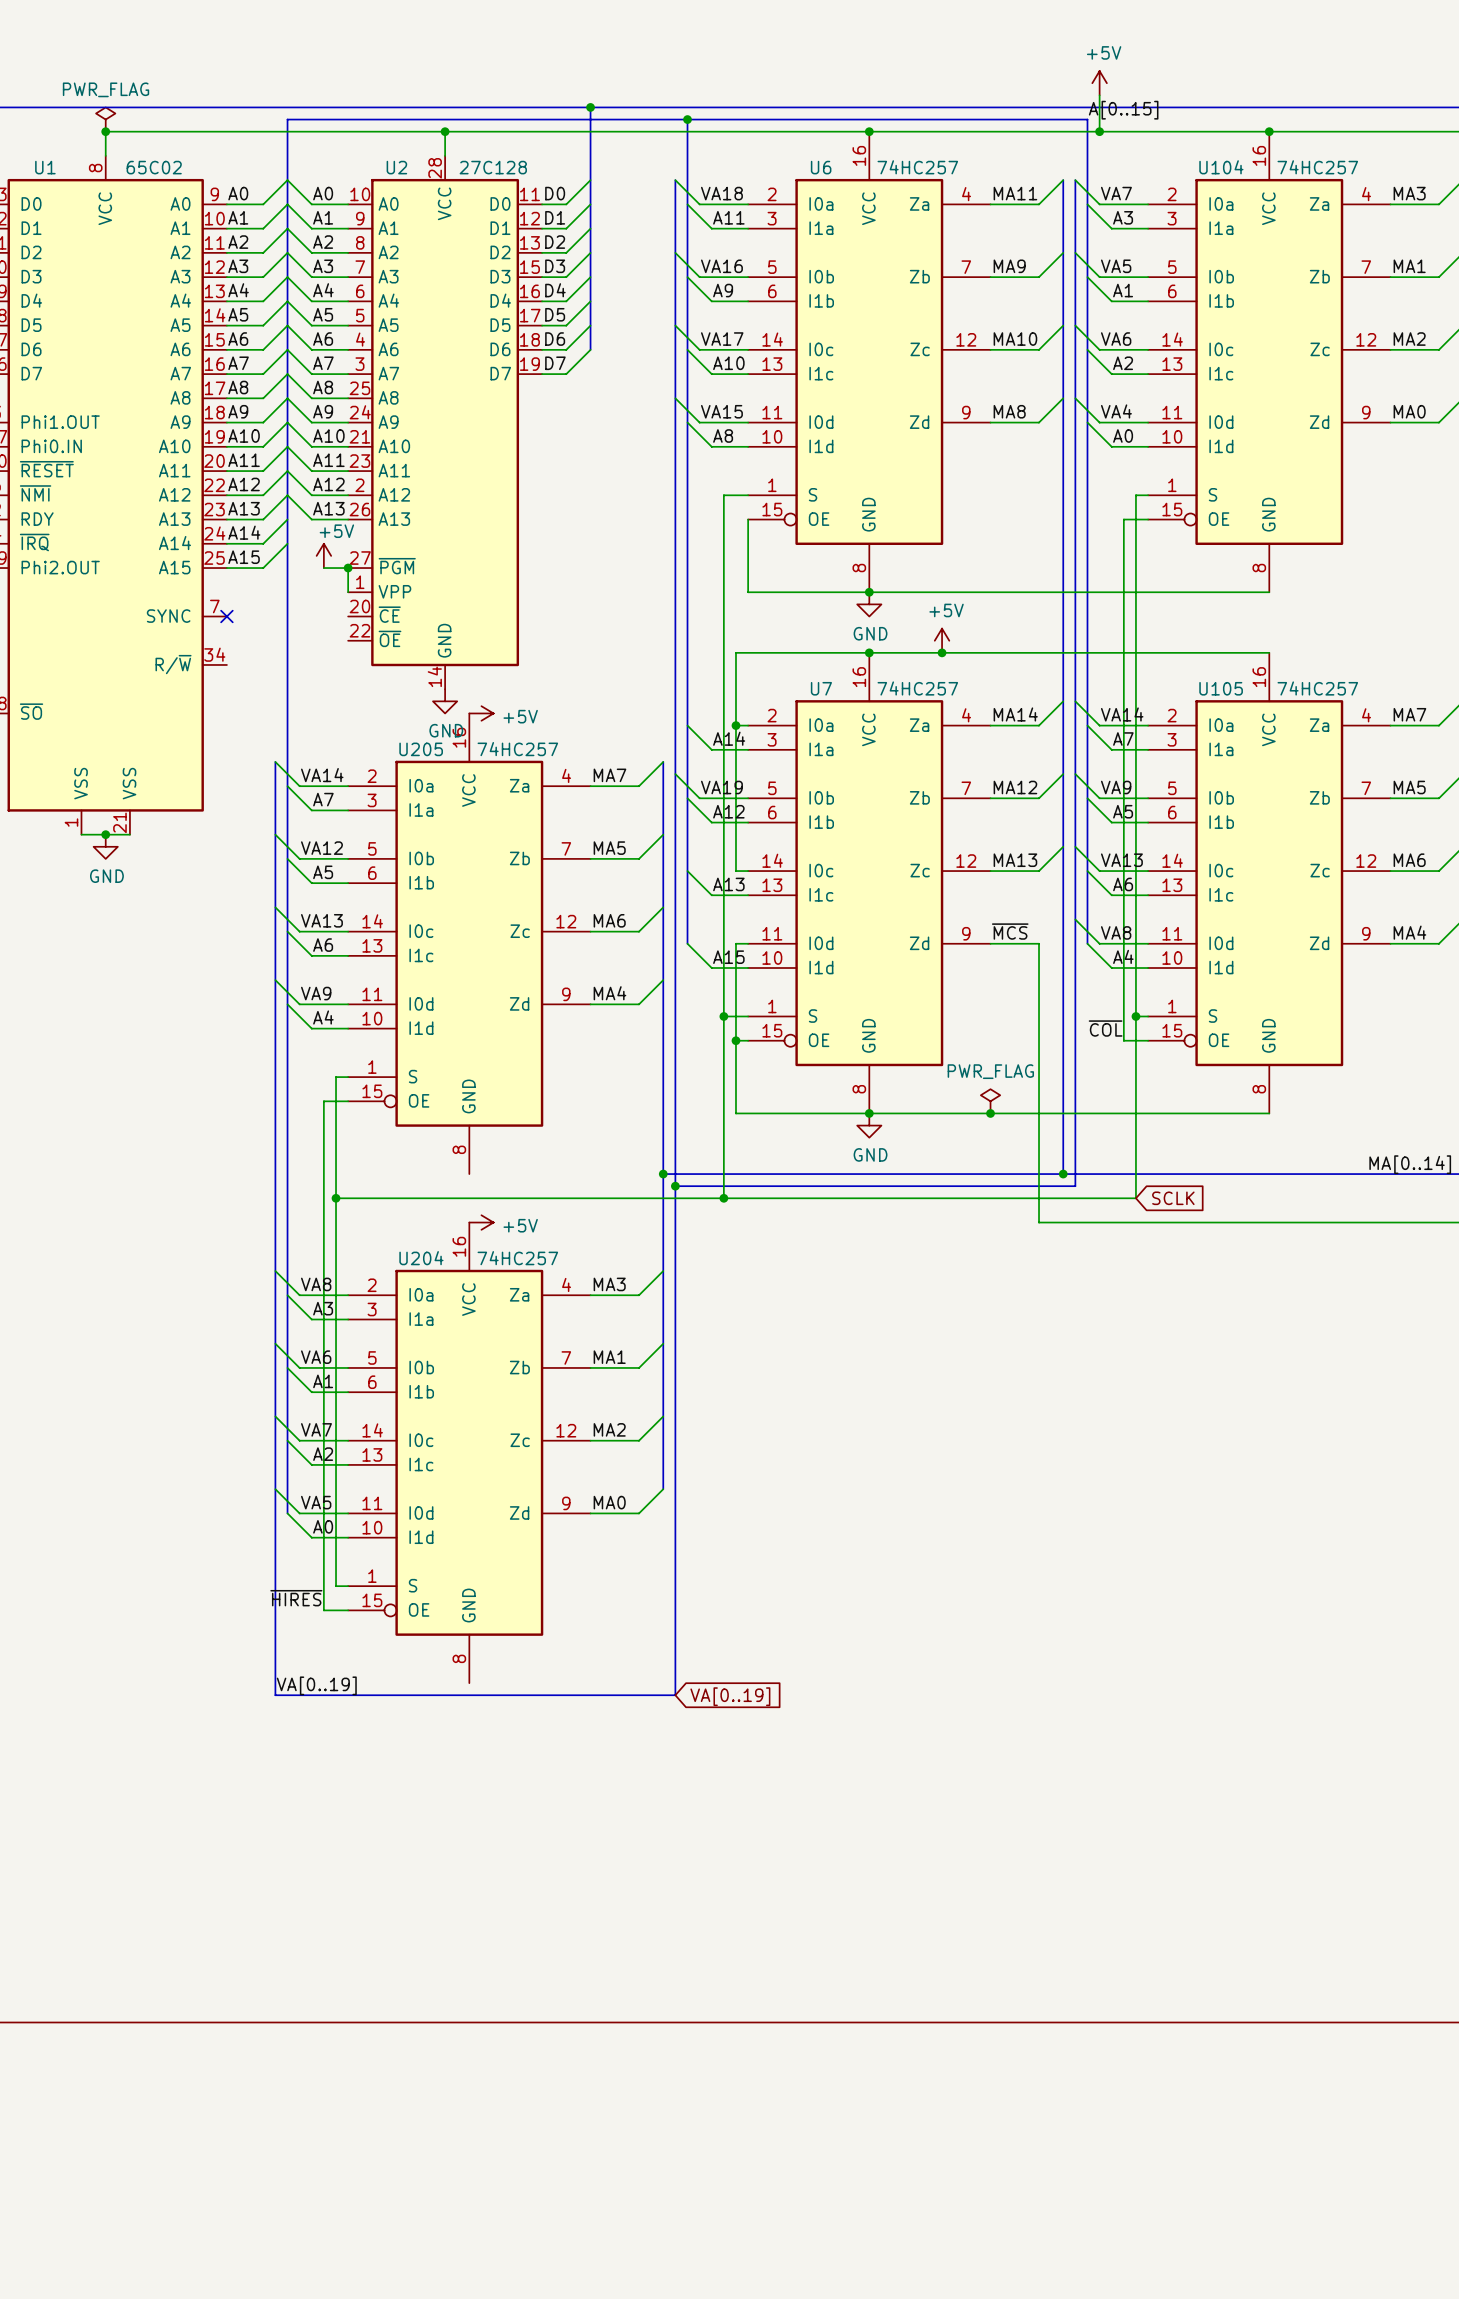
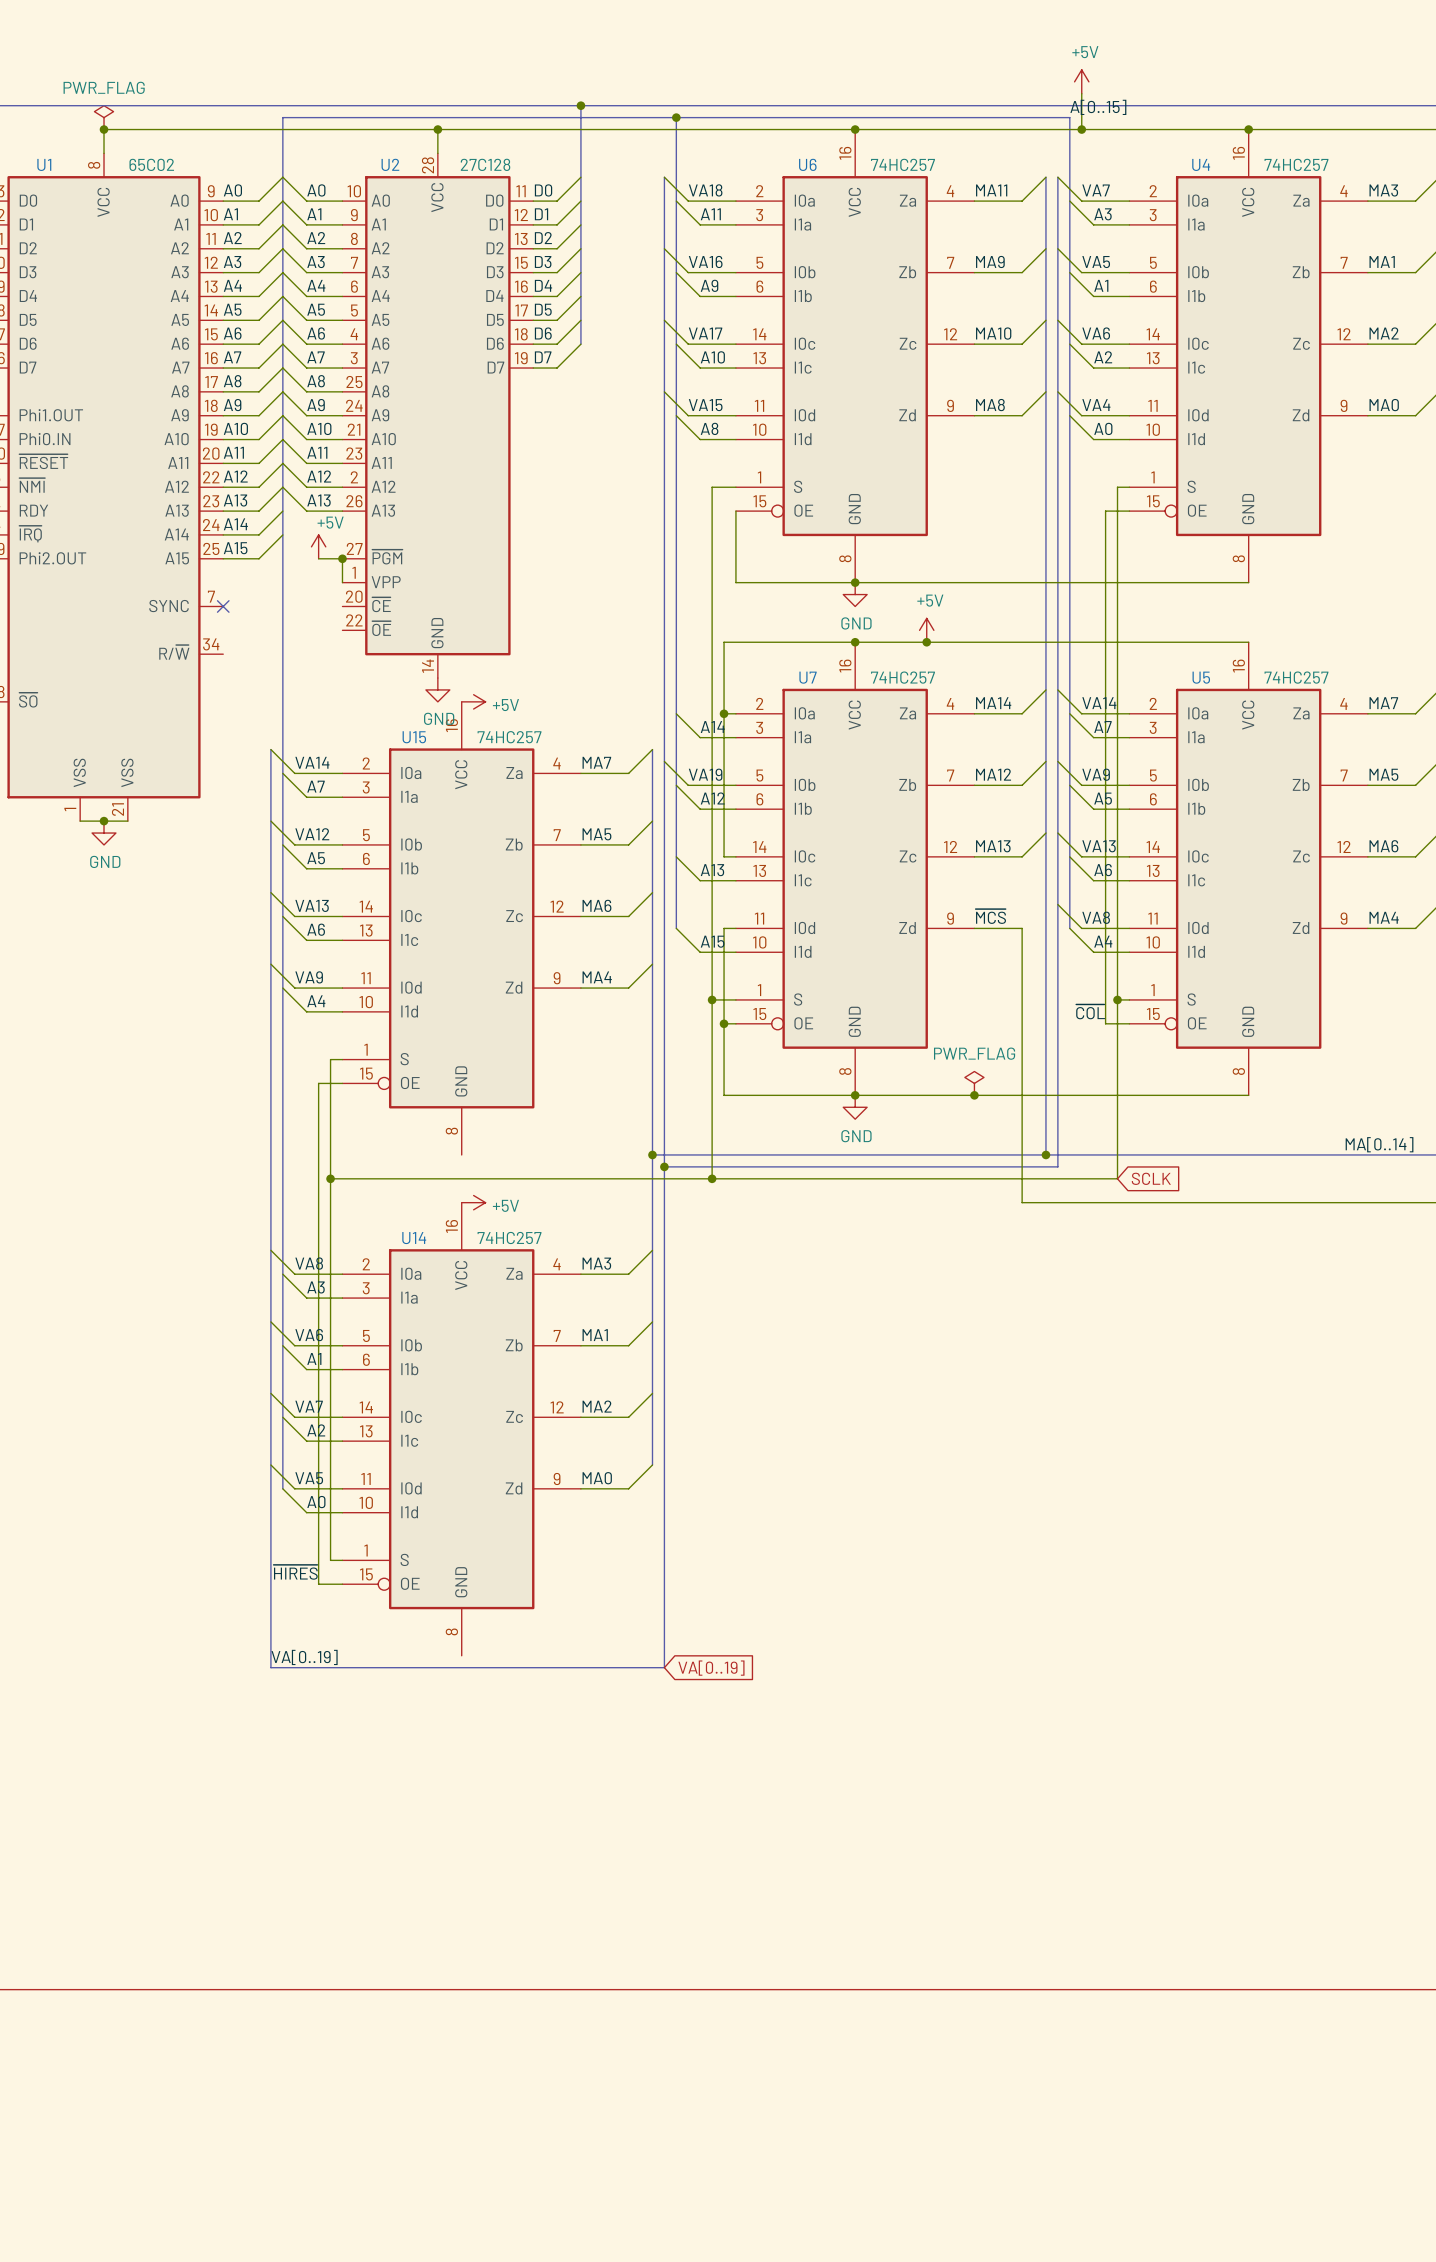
U104 name: U104 (1221, 167) -> U4 (1201, 164)
U105 name: U105 (1221, 688) -> U5 (1201, 677)
U205 name: U205 (421, 749) -> U15 (414, 737)
U204 name: U204 (421, 1258) -> U14 (414, 1238)

